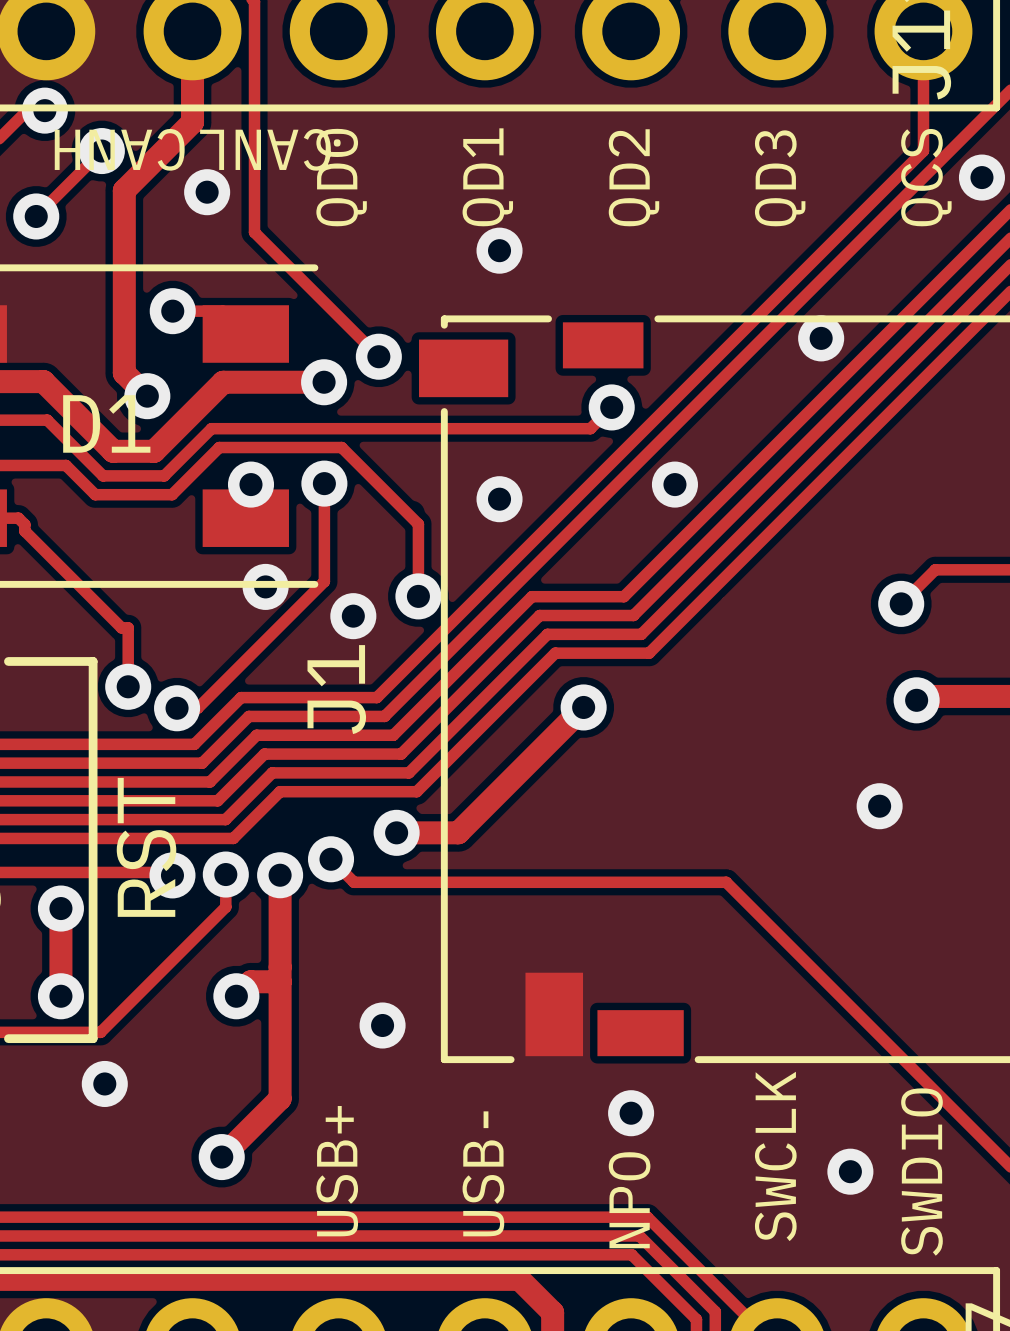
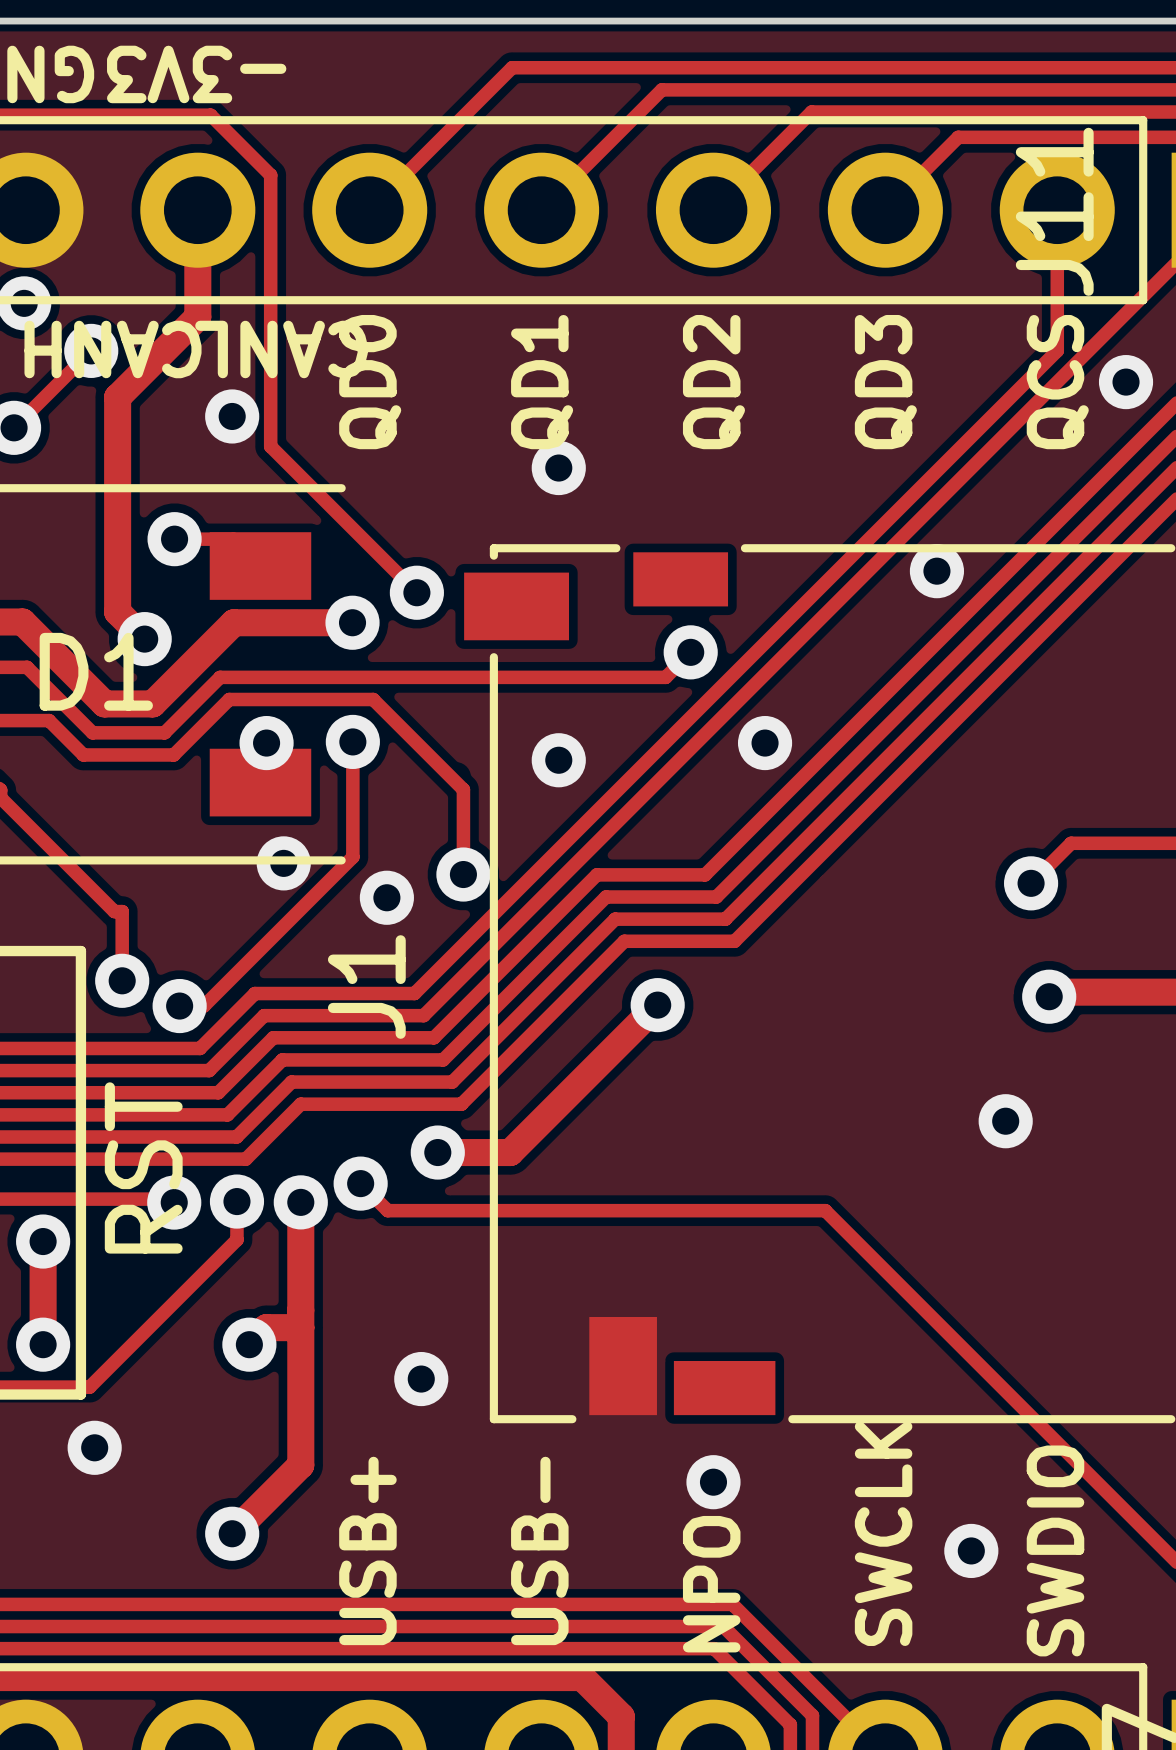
via position: (207, 192) -> (232, 416)

